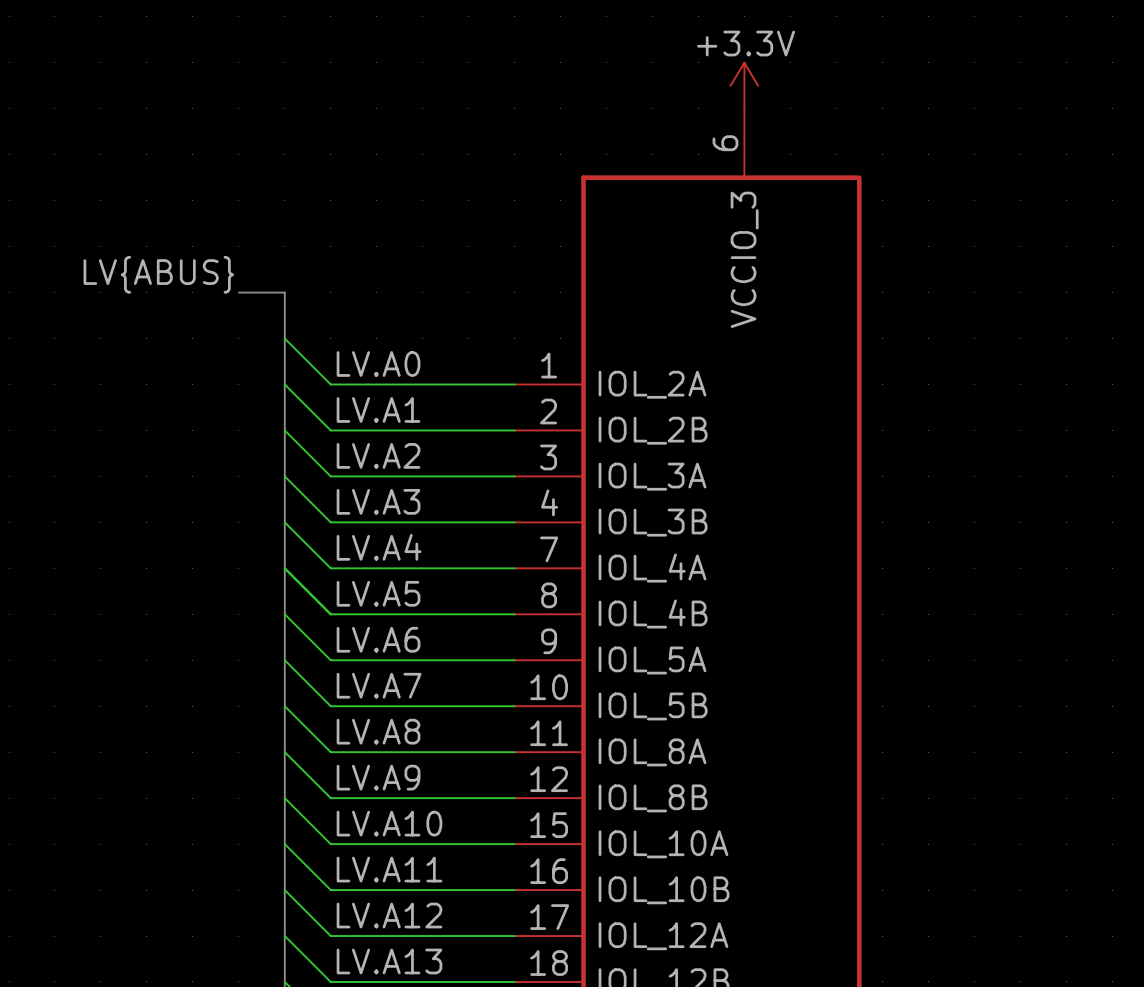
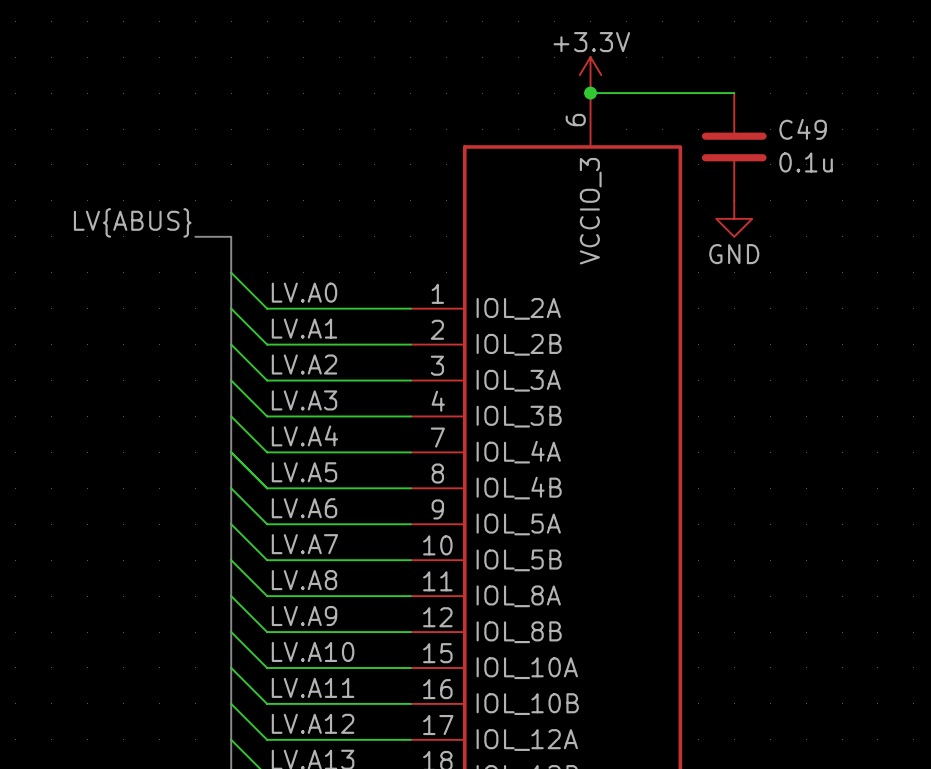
wire: none -> (590, 93) (734, 93)
junction: none -> (590, 93)
C49: none -> 0.1u (734, 146)
power symbol: none -> GND (734, 218)

